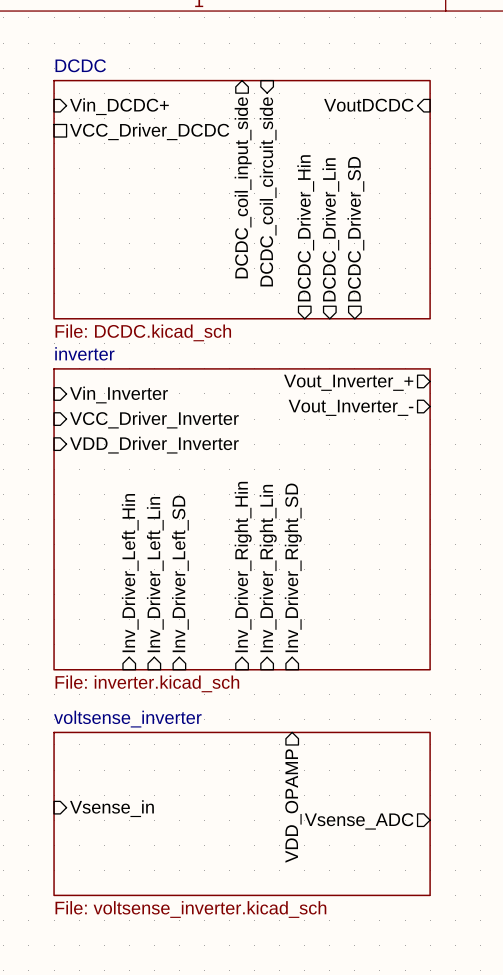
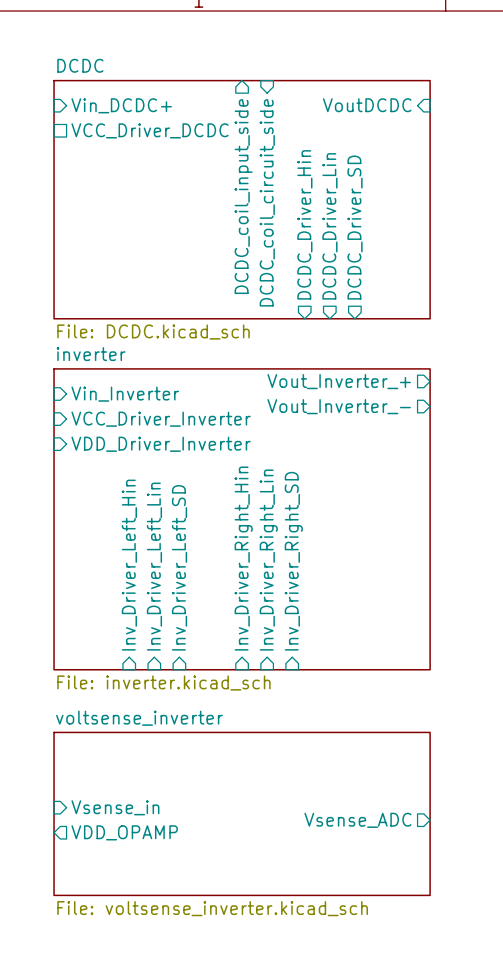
sheet pin rotation: 0° (293, 806) -> 90° counterclockwise (124, 832)
sheet pin position: VDD_OPAMP (293, 806) -> VDD_OPAMP (124, 832)

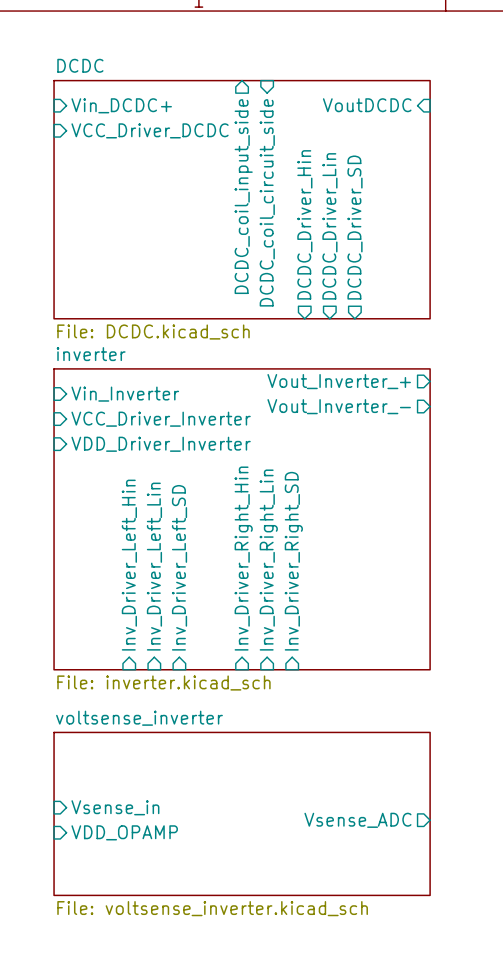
sheet pin shape: passive (150, 130) -> input (150, 130)
sheet pin shape: output (124, 832) -> input (124, 832)

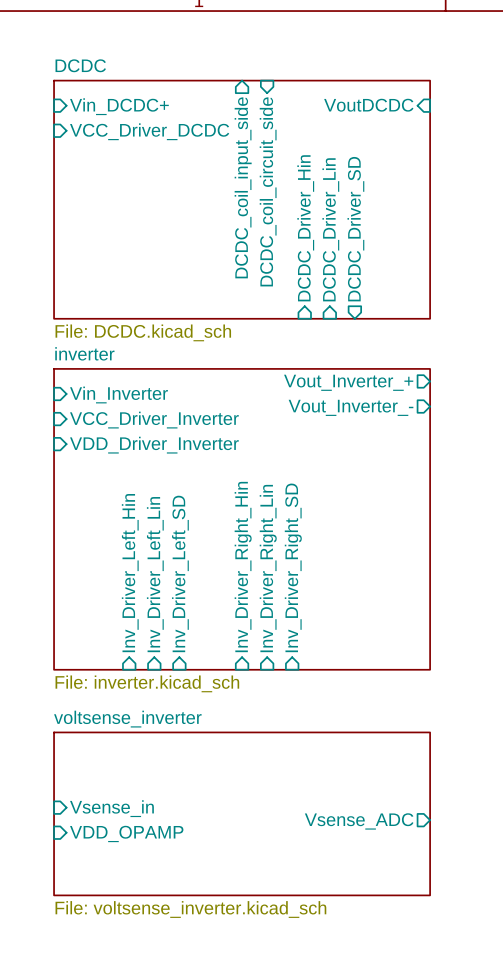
sheet pin shape: output (304, 224) -> input (305, 228)
sheet pin shape: output (329, 226) -> input (330, 229)

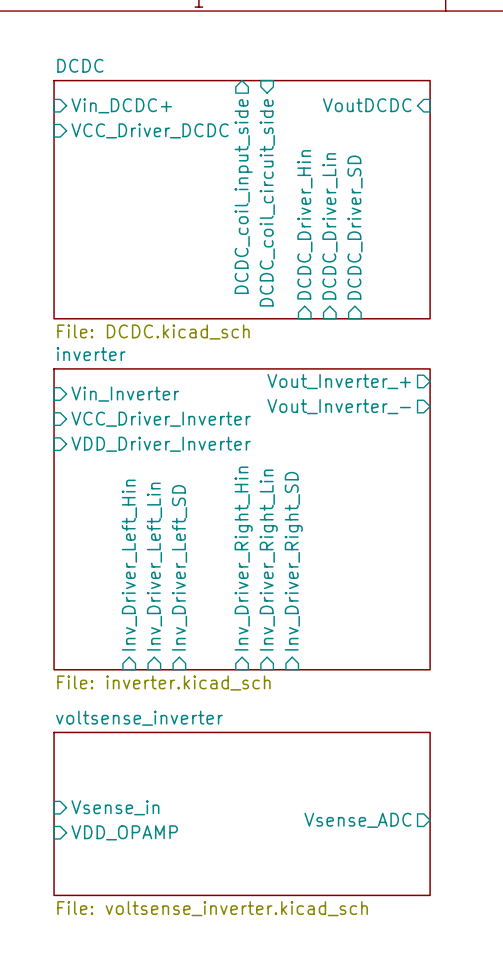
sheet pin shape: output (355, 229) -> input (355, 227)

